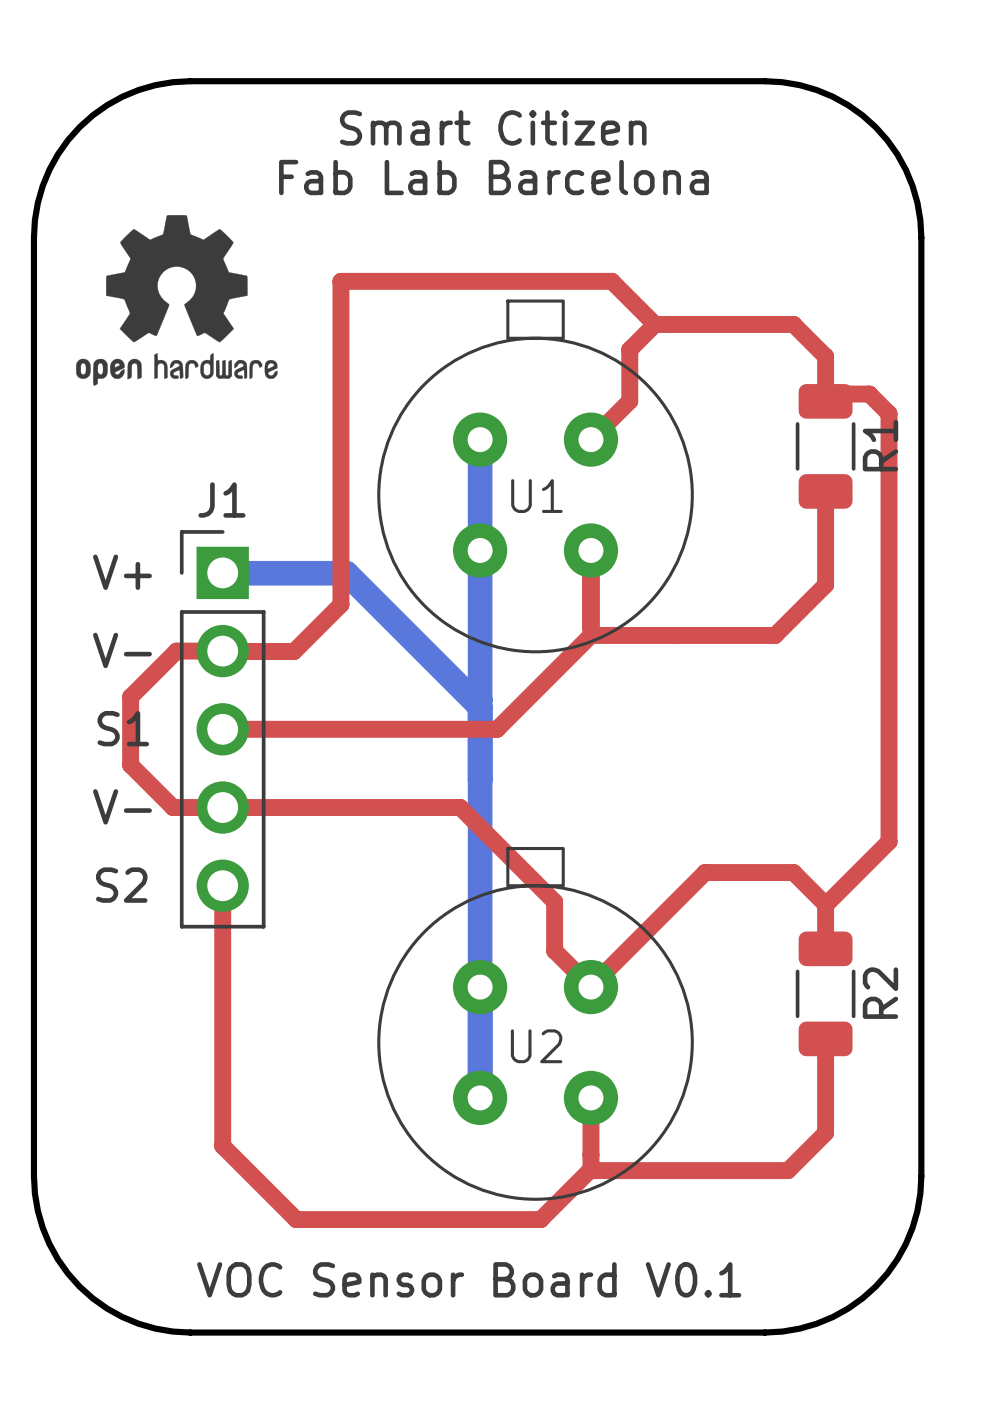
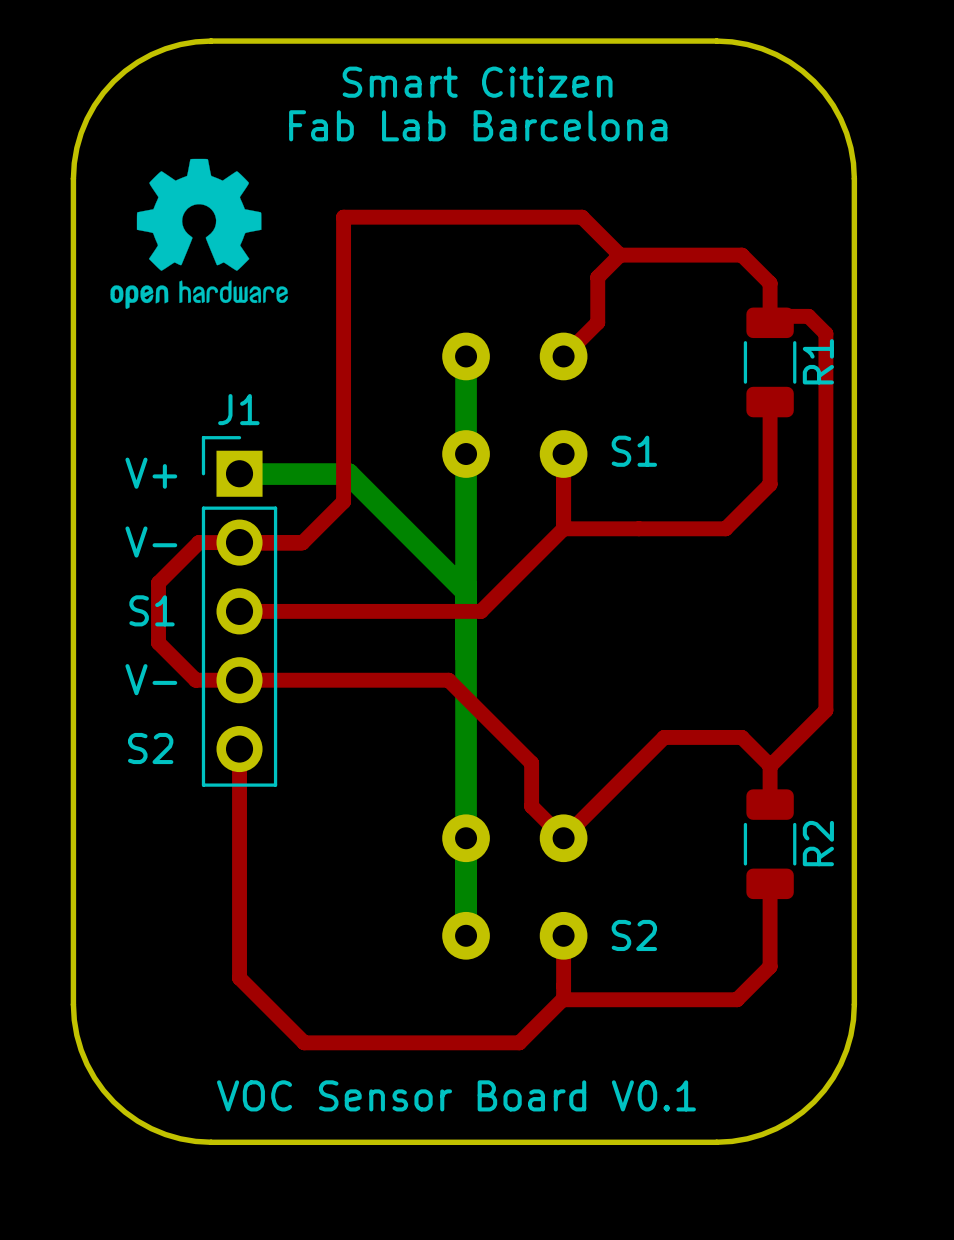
U1: (535, 476) -> none
text: none -> S1 (634, 451)
U2: (535, 1023) -> none
text: none -> S2 (634, 935)

